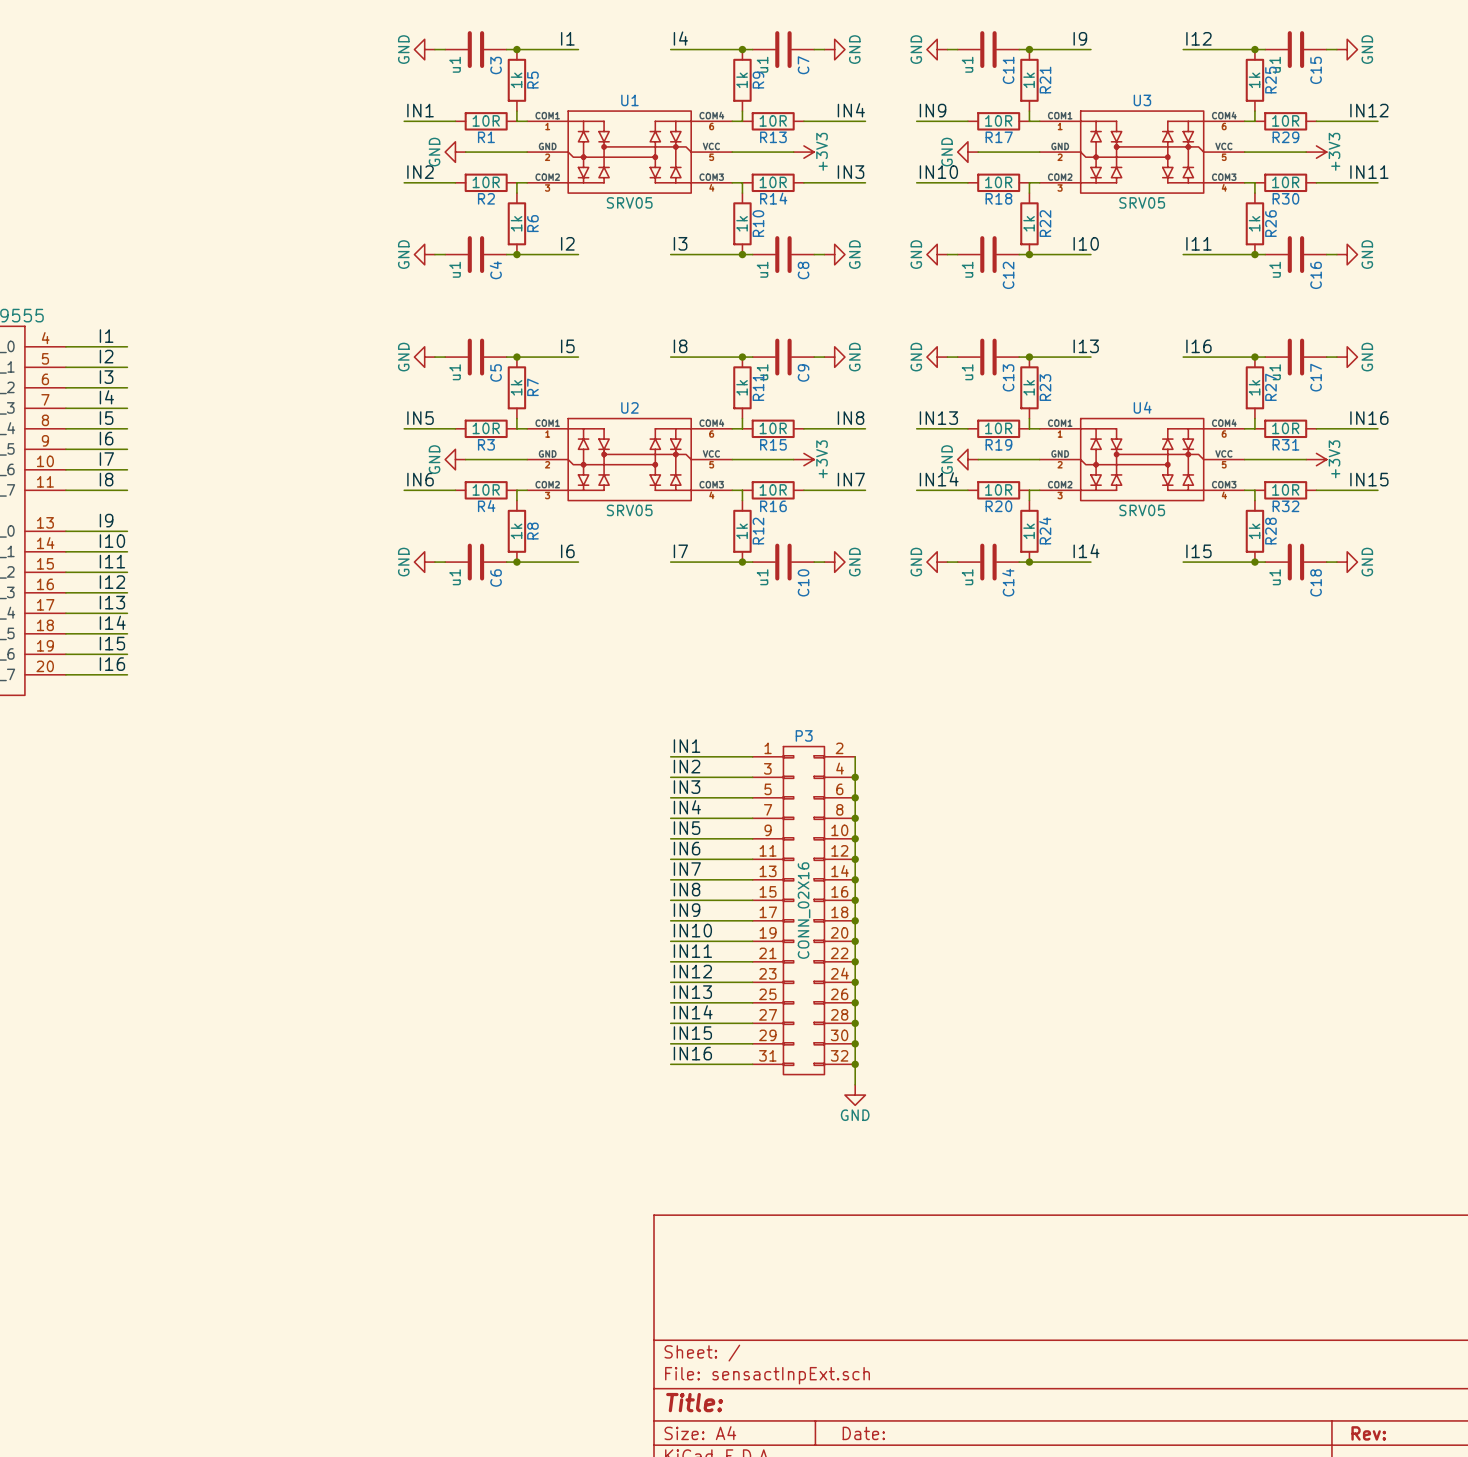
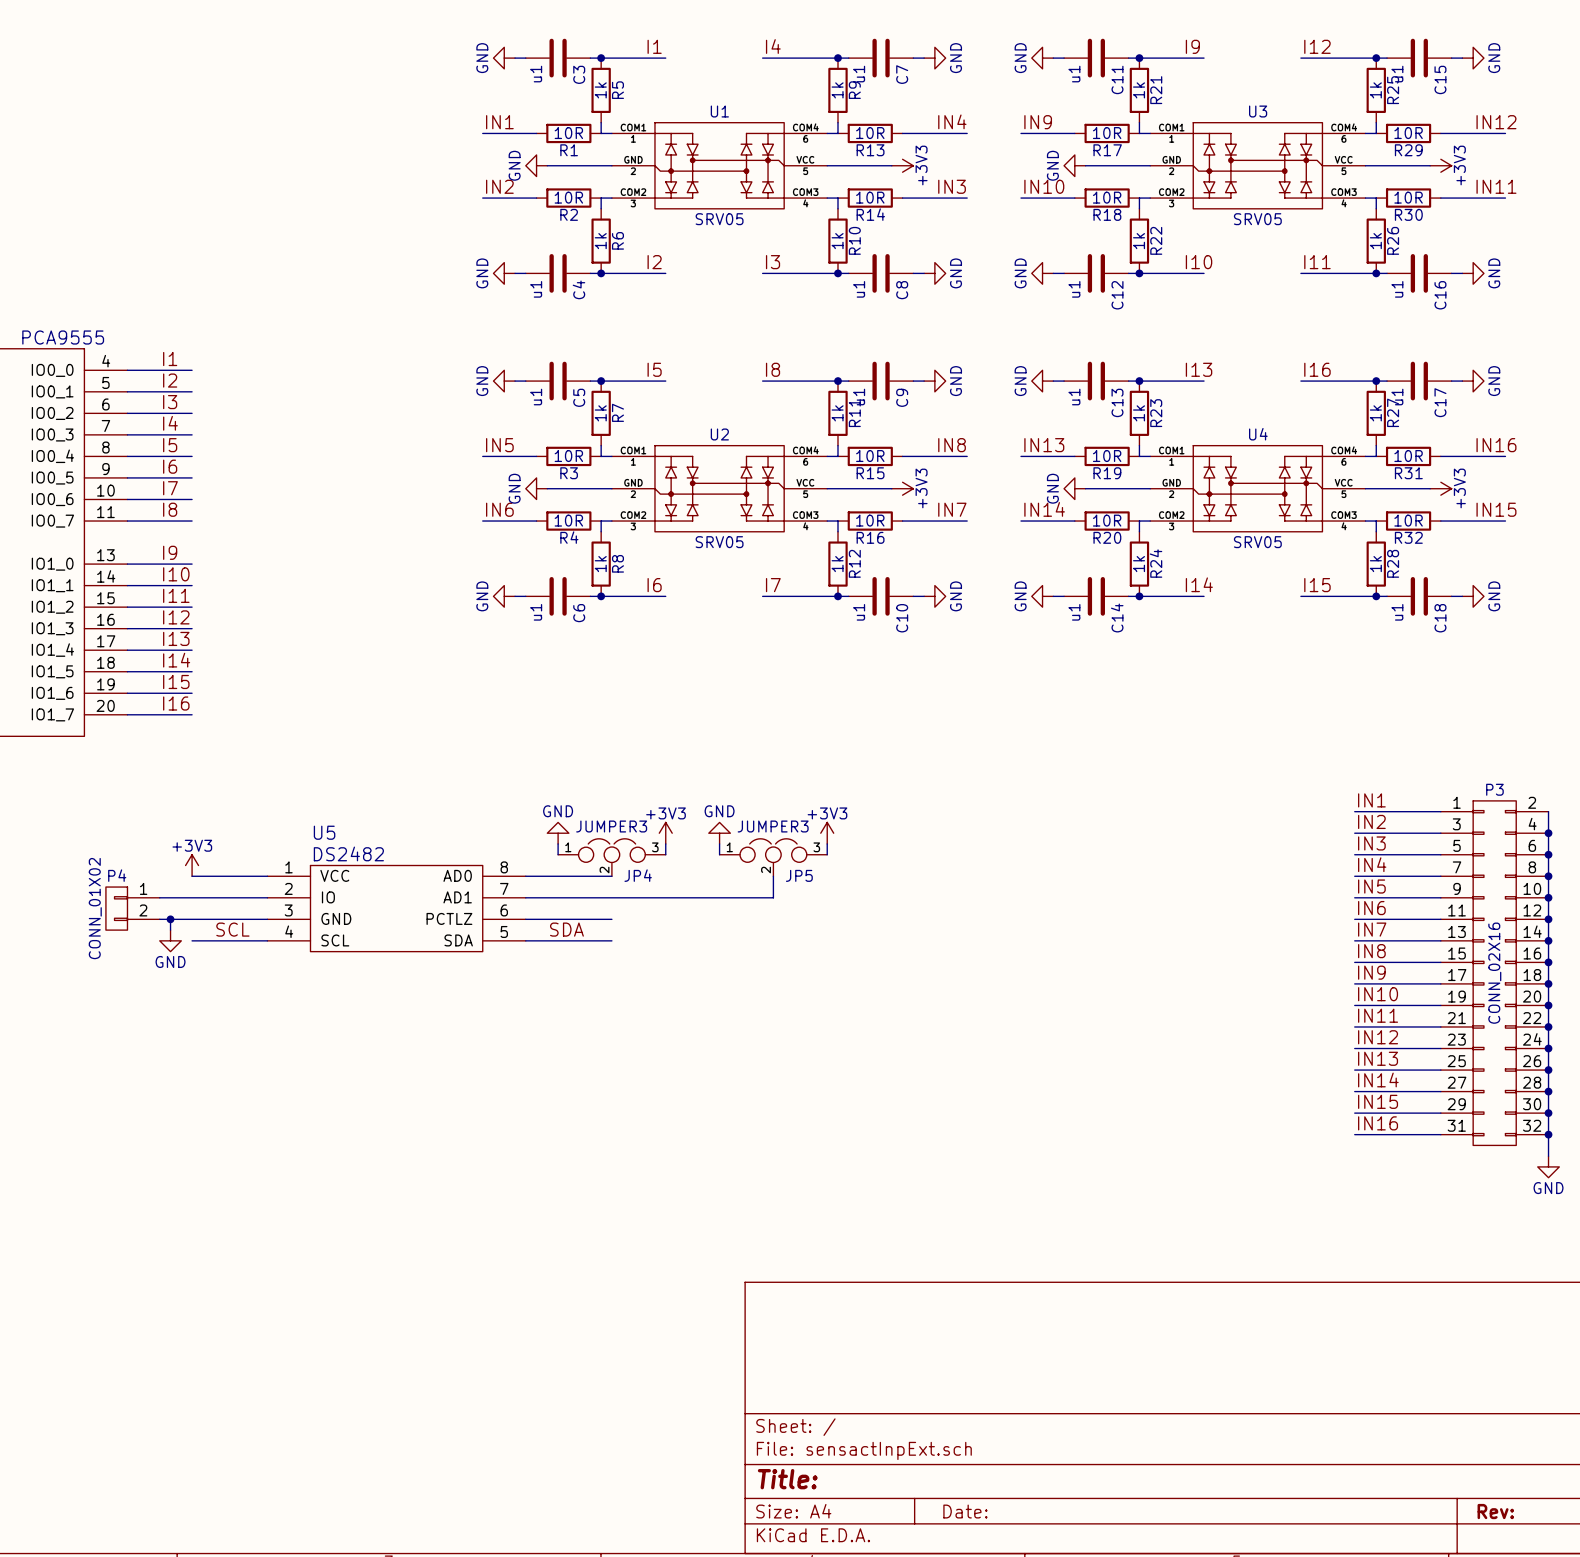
label: IN1 (687, 746) -> none
wire: (670, 756) (752, 756) -> none
wire: (855, 756) (855, 1084) -> none
label: none -> IN1 (1371, 800)
label: IN2 (687, 766) -> none
wire: none -> (1354, 811) (1440, 811)
wire: none -> (1548, 811) (1548, 1156)
label: none -> IN2 (1371, 821)
wire: (670, 777) (752, 777) -> none
junction: (855, 777) -> none
power symbol: none -> GND (558, 833)
power symbol: none -> +3V3 (665, 833)
power symbol: none -> GND (719, 833)
label: IN3 (687, 787) -> none
power symbol: none -> +3V3 (827, 833)
wire: none -> (1354, 833) (1440, 833)
junction: none -> (1548, 833)
wire: none -> (558, 843) (558, 854)
wire: none -> (665, 843) (665, 854)
wire: none -> (719, 843) (719, 854)
wire: (670, 797) (752, 797) -> none
wire: none -> (827, 843) (827, 854)
junction: (855, 797) -> none
label: none -> IN3 (1371, 843)
label: IN4 (687, 807) -> none
wire: none -> (1354, 854) (1440, 854)
junction: none -> (1548, 854)
JP4: none -> JUMPER3 (611, 857)
JP5: none -> JUMPER3 (773, 857)
label: none -> IN4 (1372, 864)
power symbol: none -> +3V3 (192, 865)
wire: (670, 818) (752, 818) -> none
junction: (855, 818) -> none
wire: none -> (192, 876) (267, 876)
wire: none -> (525, 876) (611, 876)
wire: none -> (773, 876) (773, 897) (525, 897)
label: IN5 (687, 828) -> none
wire: none -> (1354, 876) (1440, 876)
junction: none -> (1548, 876)
wire: (670, 838) (752, 838) -> none
junction: (855, 838) -> none
label: none -> IN5 (1371, 886)
label: IN6 (687, 848) -> none
wire: none -> (159, 897) (267, 897)
wire: none -> (1354, 897) (1440, 897)
junction: none -> (1548, 897)
label: none -> IN6 (1371, 908)
P4: none -> CONN_01X02 (132, 908)
U5: none -> DS2482 (396, 908)
wire: (670, 859) (752, 859) -> none
junction: (855, 859) -> none
wire: none -> (159, 919) (267, 919)
wire: none -> (170, 919) (170, 930)
junction: none -> (170, 919)
wire: none -> (525, 919) (611, 919)
label: IN7 (687, 869) -> none
wire: none -> (1354, 919) (1440, 919)
junction: none -> (1548, 919)
label: none -> SCL (232, 929)
label: none -> SDA (566, 929)
wire: (670, 879) (752, 879) -> none
junction: (855, 879) -> none
label: none -> IN7 (1372, 929)
label: IN8 (687, 889) -> none
power symbol: none -> GND (170, 940)
wire: none -> (192, 940) (267, 940)
wire: none -> (525, 940) (611, 940)
wire: none -> (1354, 940) (1440, 940)
junction: none -> (1548, 940)
label: none -> IN8 (1371, 951)
wire: (670, 900) (752, 900) -> none
junction: (855, 900) -> none
label: IN9 (687, 910) -> none
P3 position: (803, 910) -> (1494, 973)
wire: none -> (1354, 962) (1440, 962)
junction: none -> (1548, 962)
wire: (670, 920) (752, 920) -> none
junction: (855, 920) -> none
label: none -> IN9 (1371, 972)
label: IN10 (692, 930) -> none
wire: none -> (1354, 983) (1440, 983)
junction: none -> (1548, 983)
label: none -> IN10 (1378, 994)
wire: (670, 941) (752, 941) -> none
junction: (855, 941) -> none
label: IN11 (692, 951) -> none
wire: none -> (1354, 1005) (1440, 1005)
junction: none -> (1548, 1005)
wire: (670, 961) (752, 961) -> none
junction: (855, 961) -> none
label: none -> IN11 (1378, 1015)
label: IN12 (692, 971) -> none
wire: none -> (1354, 1026) (1440, 1026)
junction: none -> (1548, 1026)
label: none -> IN12 (1378, 1037)
wire: (670, 982) (752, 982) -> none
junction: (855, 982) -> none
label: IN13 (692, 992) -> none
wire: none -> (1354, 1048) (1440, 1048)
junction: none -> (1548, 1048)
wire: (670, 1002) (752, 1002) -> none
junction: (855, 1002) -> none
label: none -> IN13 (1378, 1058)
label: IN14 (693, 1012) -> none
wire: none -> (1354, 1070) (1440, 1070)
junction: none -> (1548, 1070)
label: none -> IN14 (1378, 1080)
wire: (670, 1023) (752, 1023) -> none
junction: (855, 1023) -> none
label: IN15 (692, 1033) -> none
wire: none -> (1354, 1091) (1440, 1091)
junction: none -> (1548, 1091)
wire: (670, 1043) (752, 1043) -> none
junction: (855, 1043) -> none
label: none -> IN15 (1378, 1101)
label: IN16 (692, 1053) -> none
wire: none -> (1354, 1113) (1440, 1113)
junction: none -> (1548, 1113)
label: none -> IN16 (1378, 1123)
wire: (670, 1064) (752, 1064) -> none
junction: (855, 1064) -> none
wire: none -> (1354, 1134) (1440, 1134)
junction: none -> (1548, 1134)
power symbol: GND (855, 1095) -> none
power symbol: none -> GND (1548, 1166)

